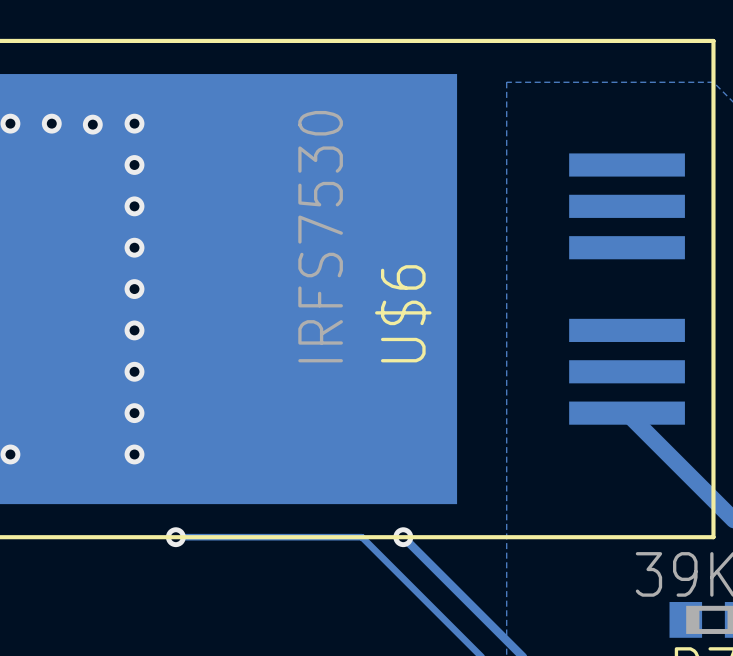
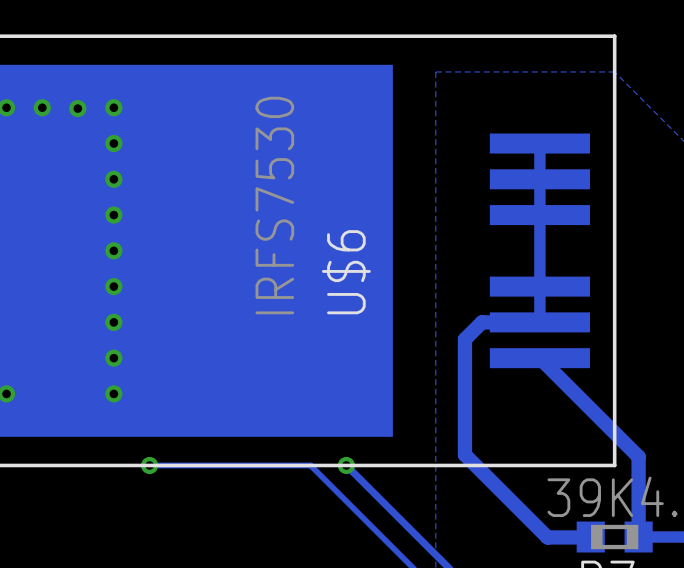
track: none -> (539, 143) (539, 322) (481, 322) (464, 339) (464, 454) (547, 537) (590, 537)

